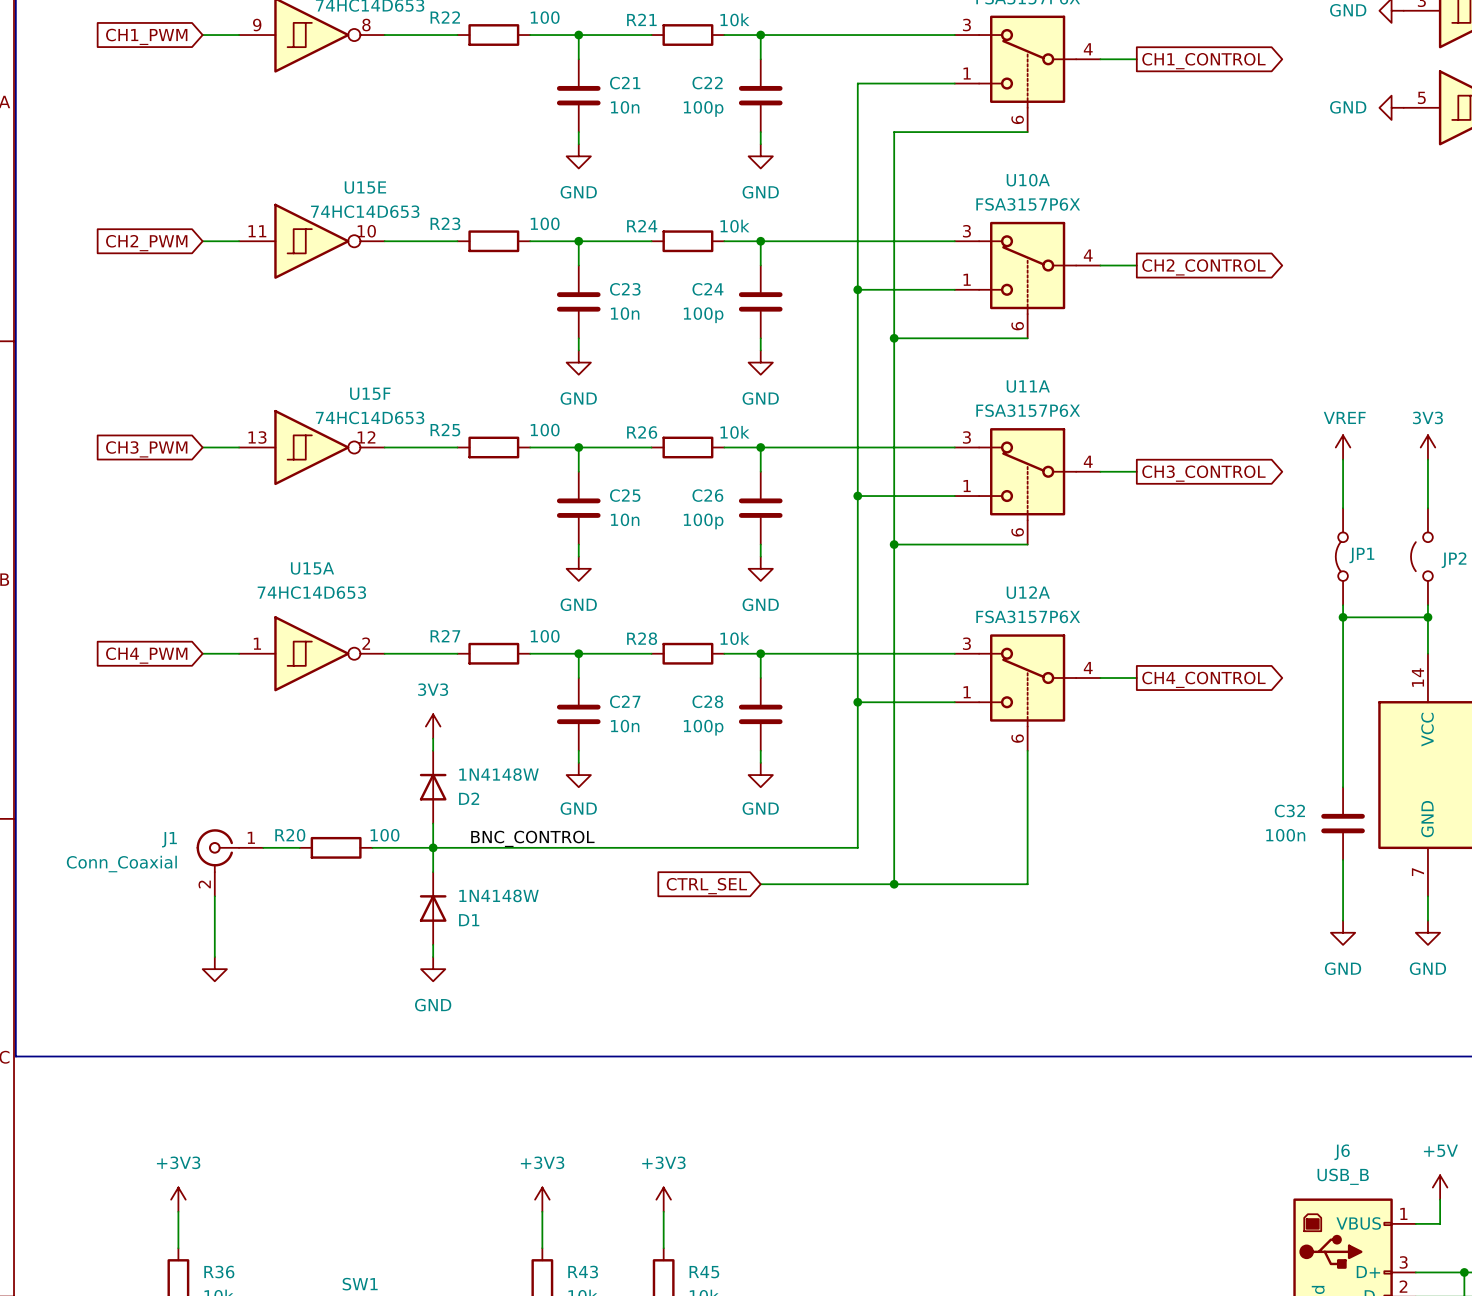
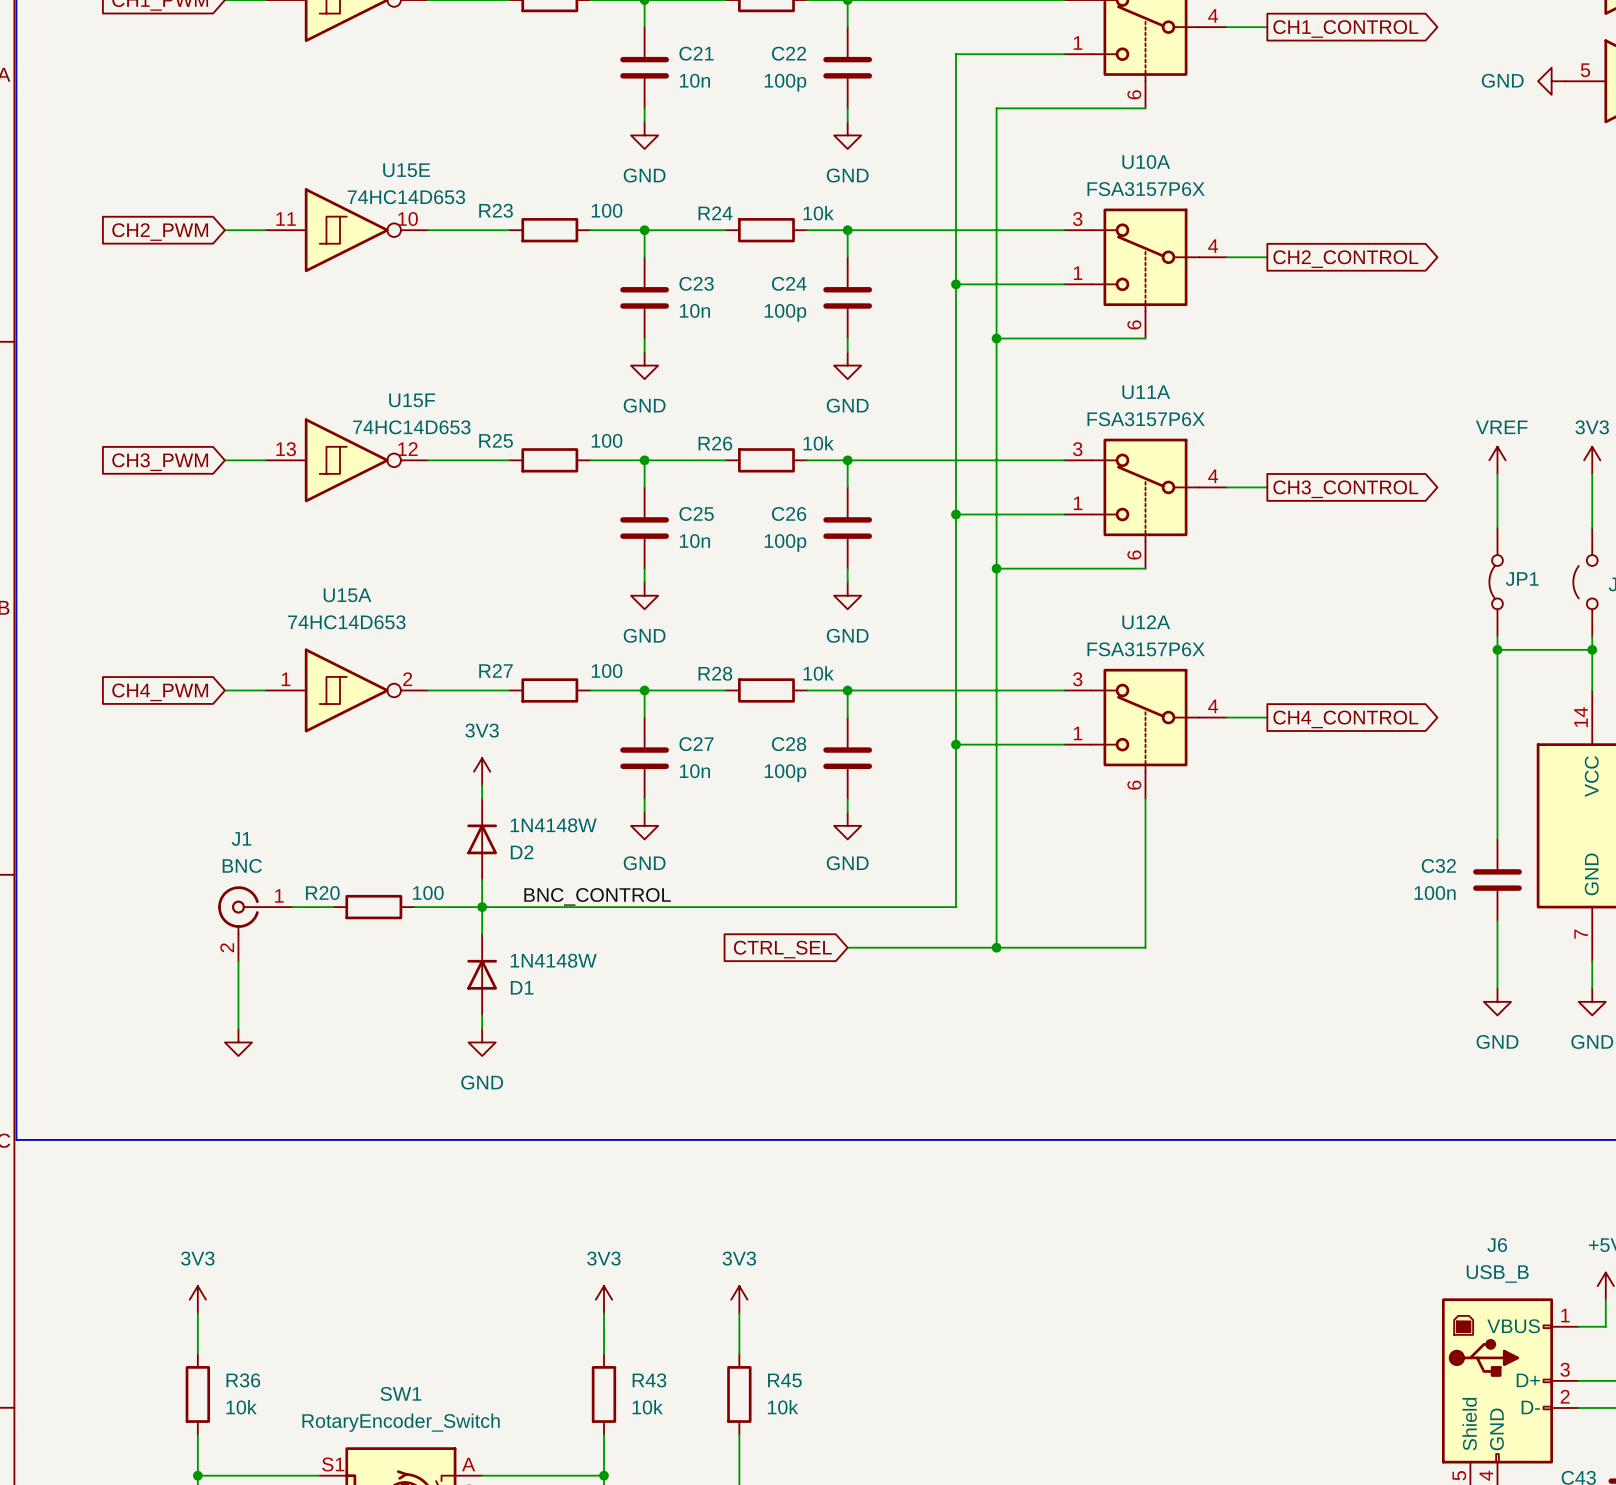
J1 name position: J1 (169, 839) -> J1 (241, 838)
J1 value: Conn_Coaxial (121, 864) -> BNC (242, 865)
power symbol: +3V3 (178, 1199) -> 3V3 (197, 1299)
power symbol: +3V3 (542, 1199) -> 3V3 (603, 1299)
power symbol: +3V3 (663, 1199) -> 3V3 (739, 1299)

